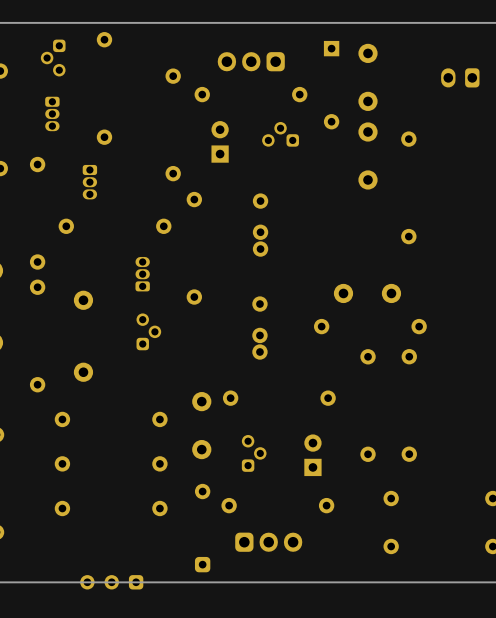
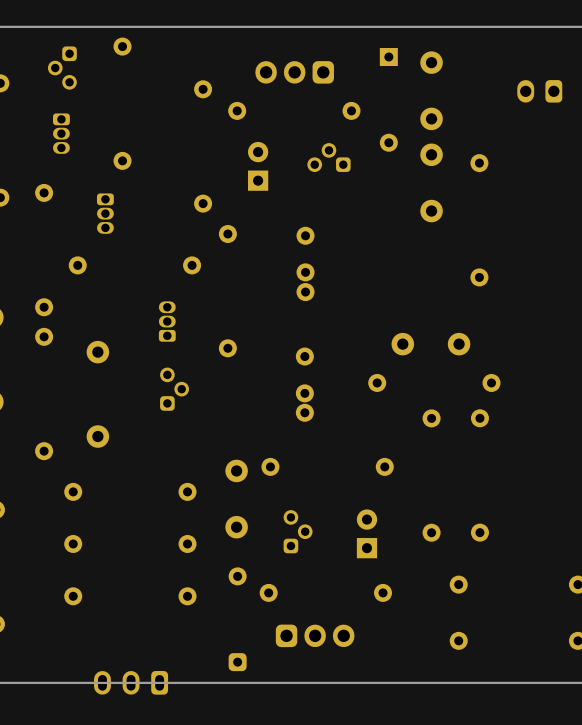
part footprint: [80, 575, 144, 590] -> [94, 671, 169, 695]

